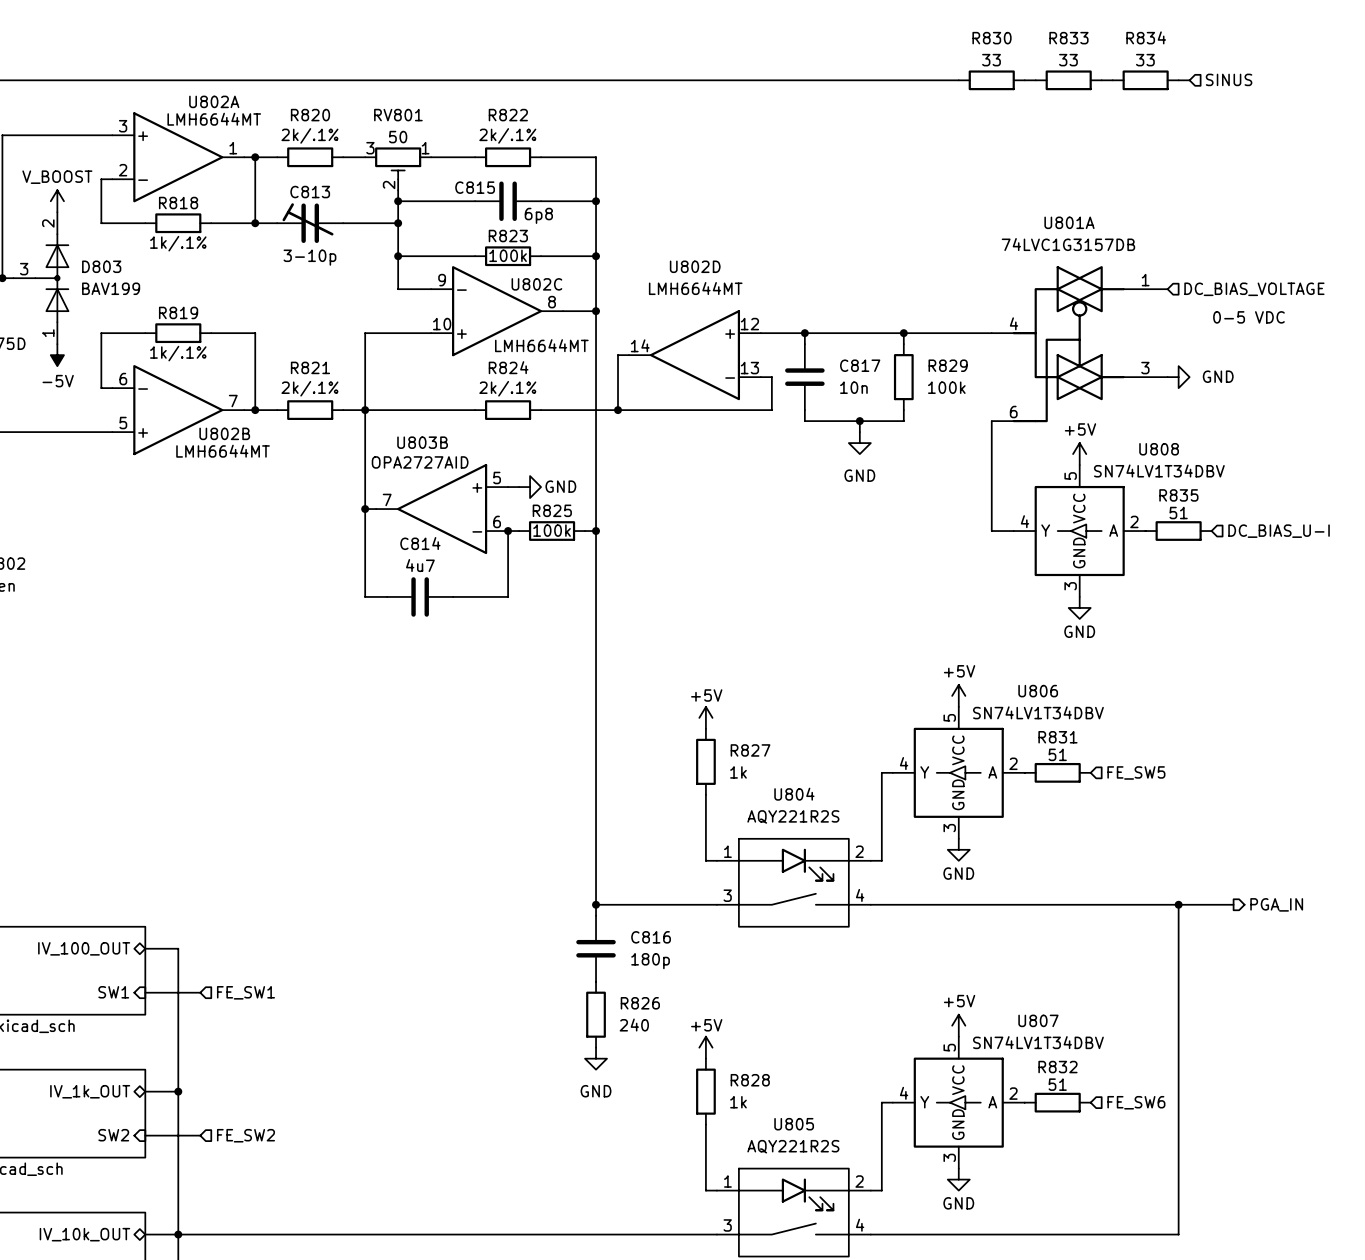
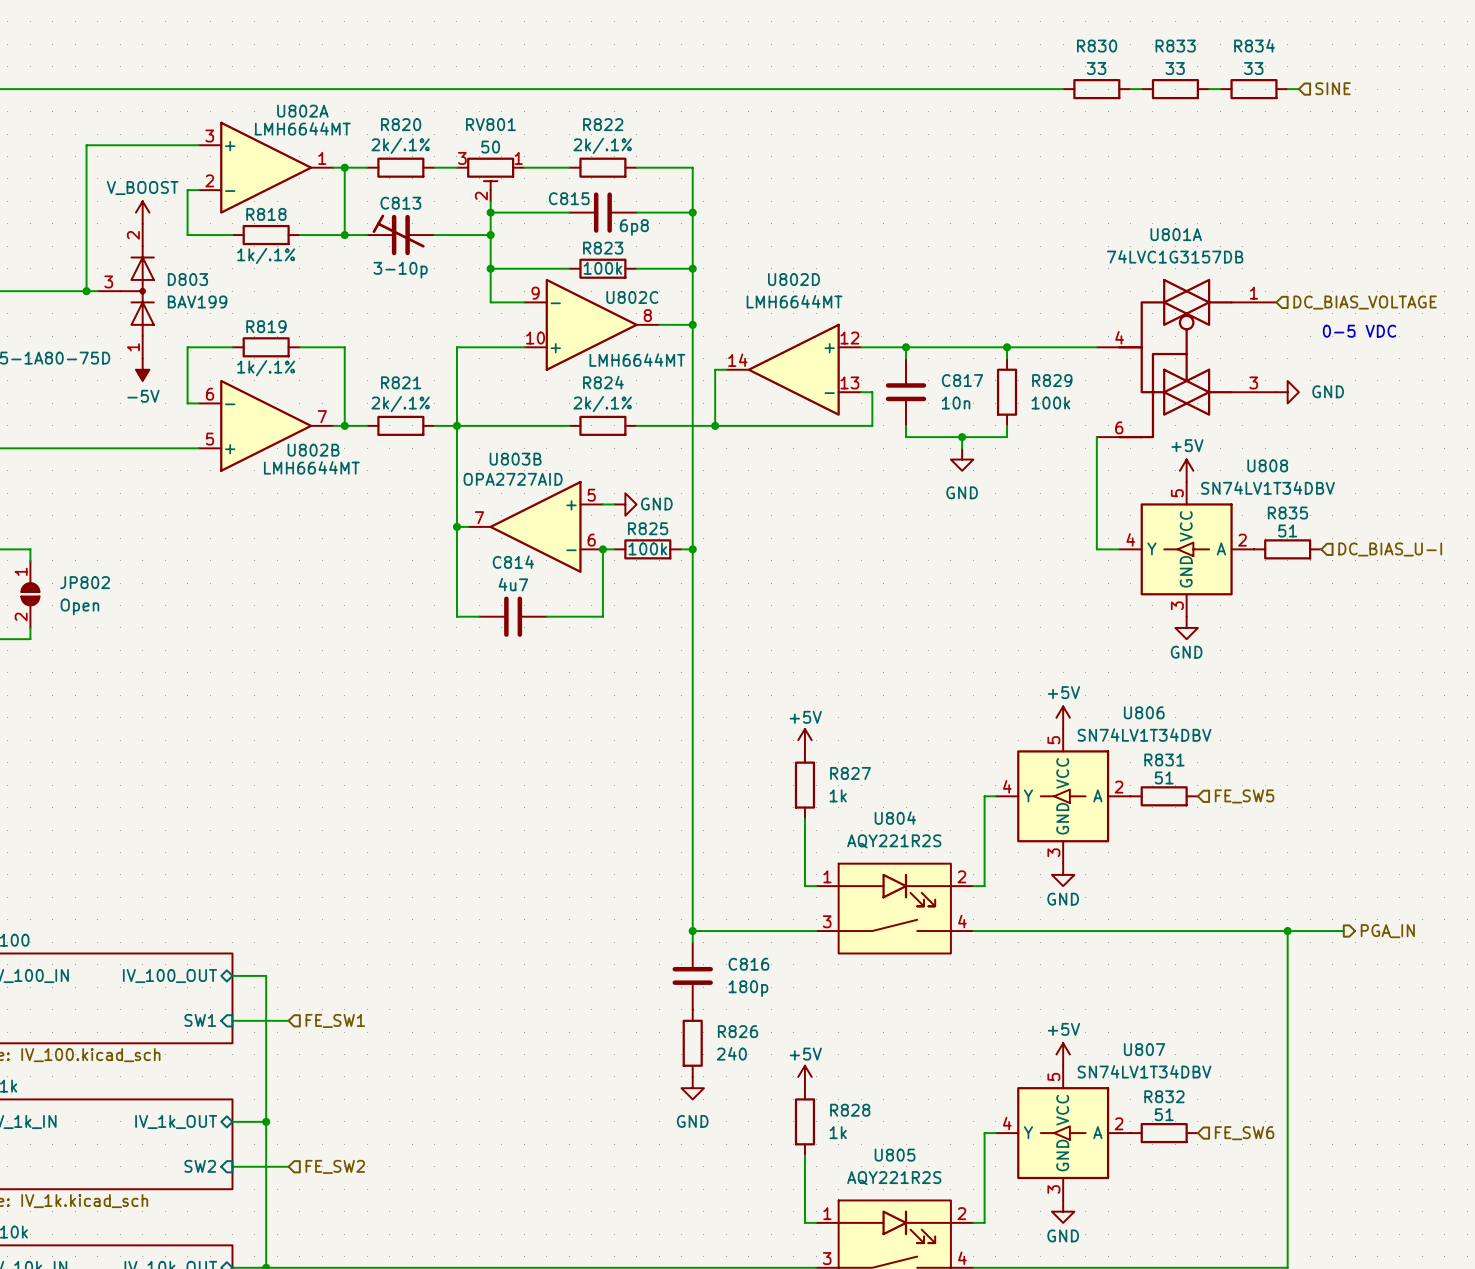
hierarchical label: SINUS (1229, 79) -> SINE (1333, 88)

